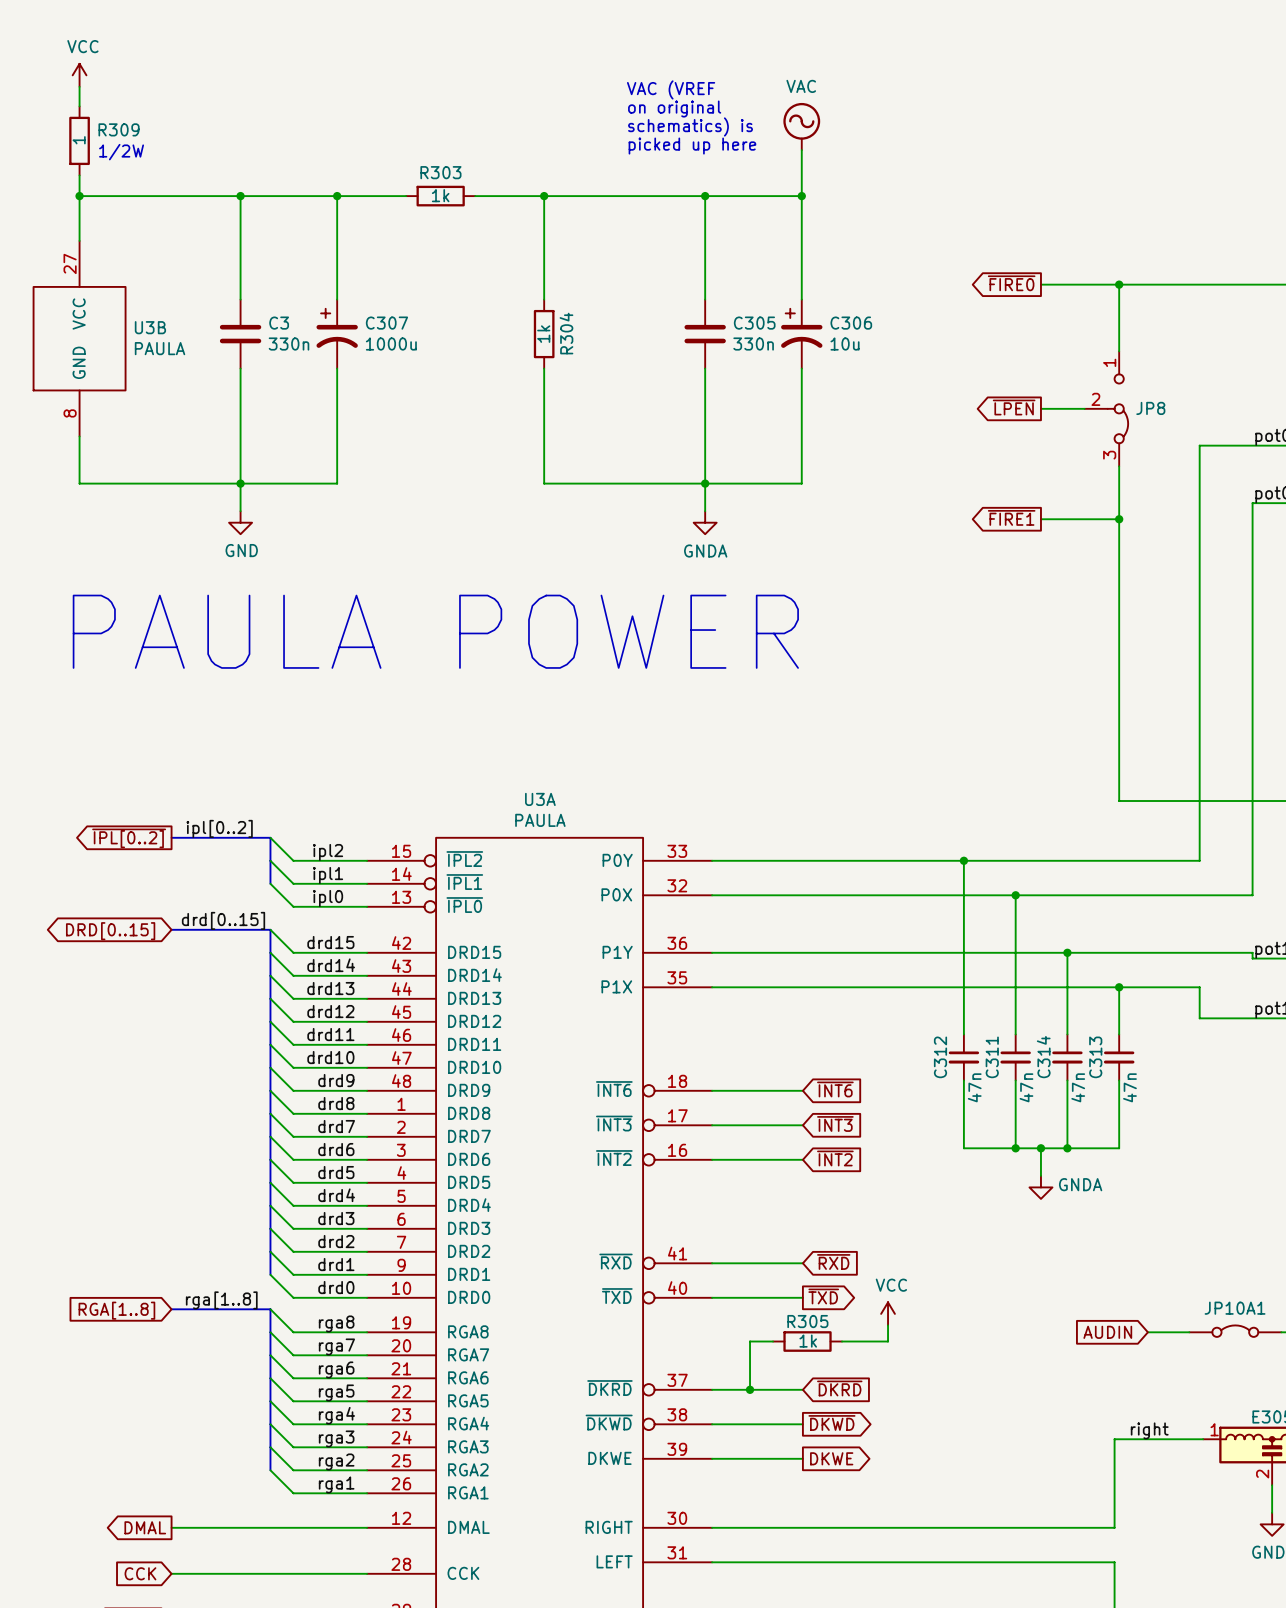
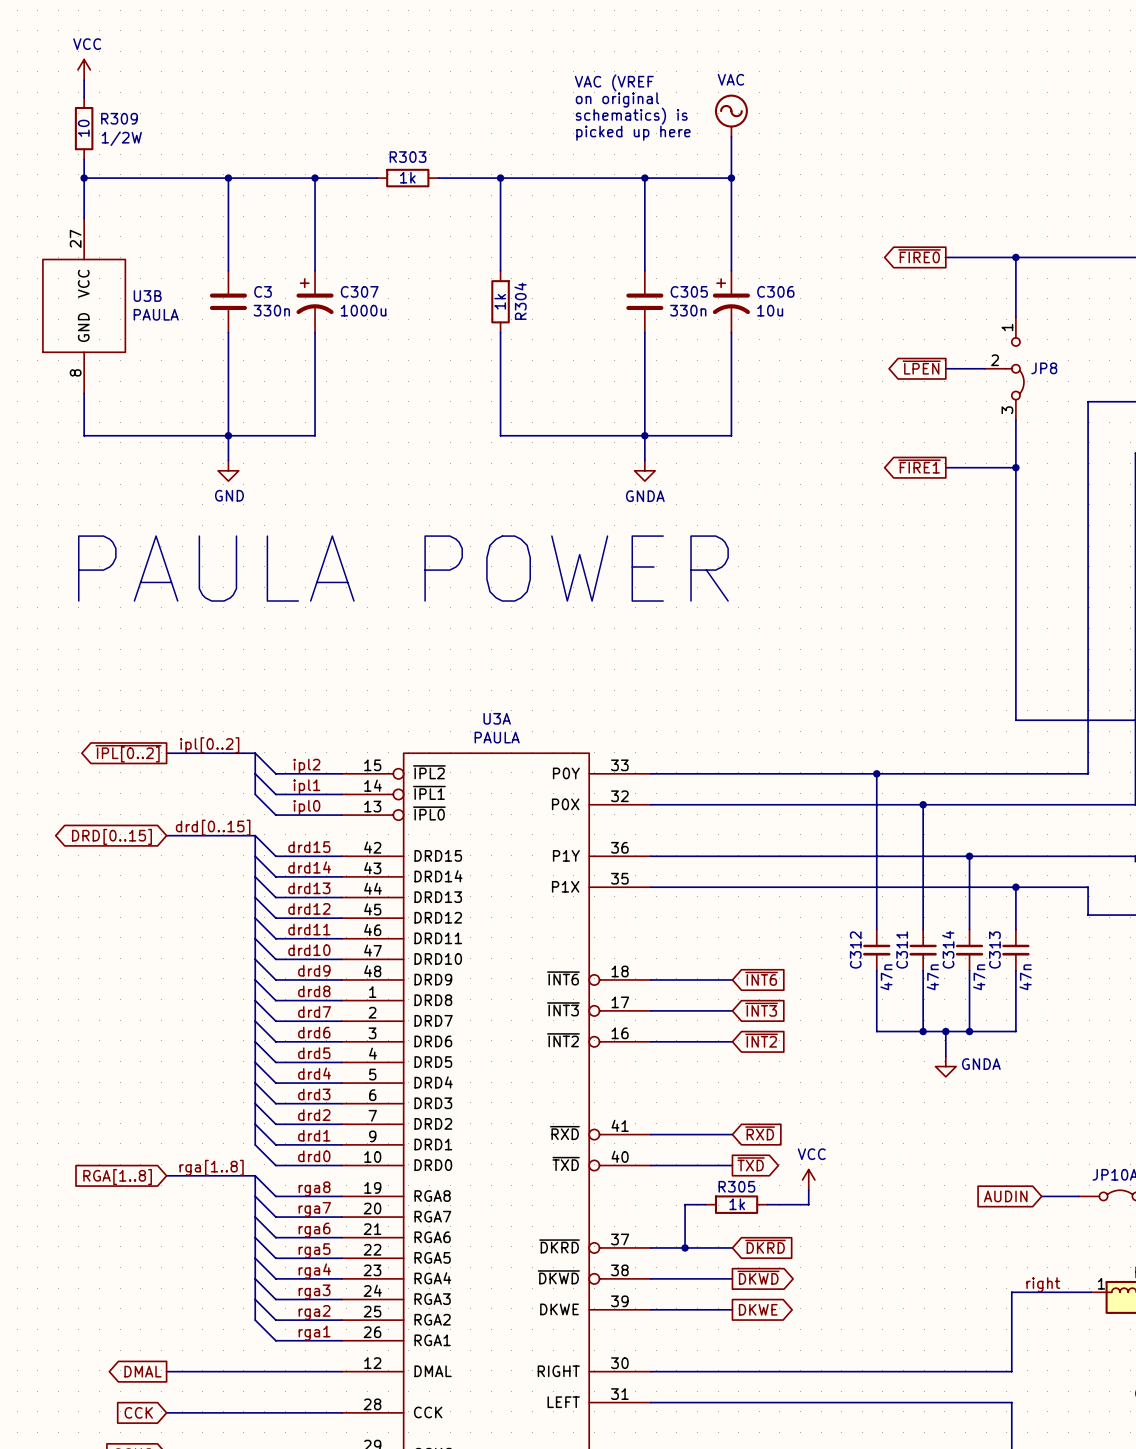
R309 value: 1 (79, 140) -> 10 (83, 128)

